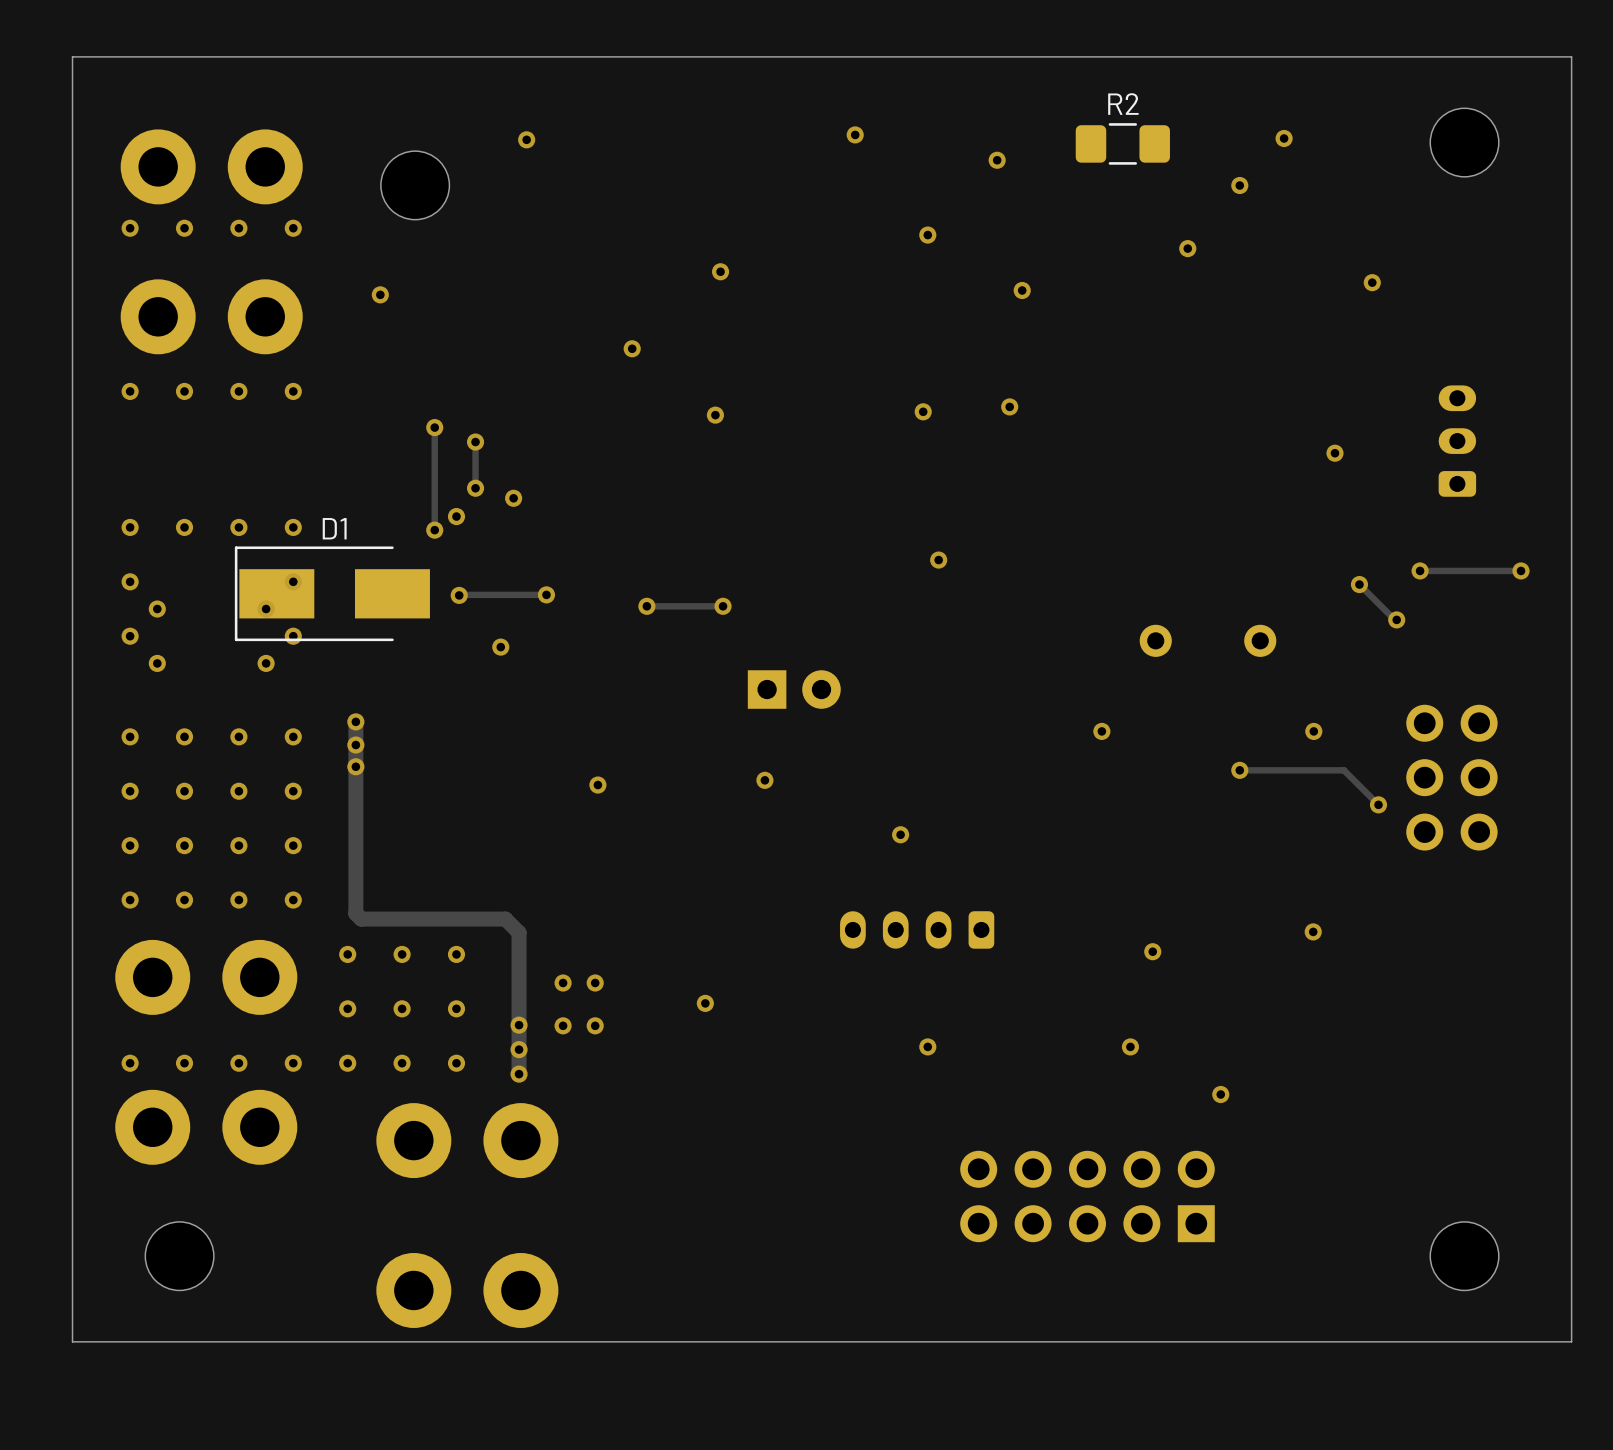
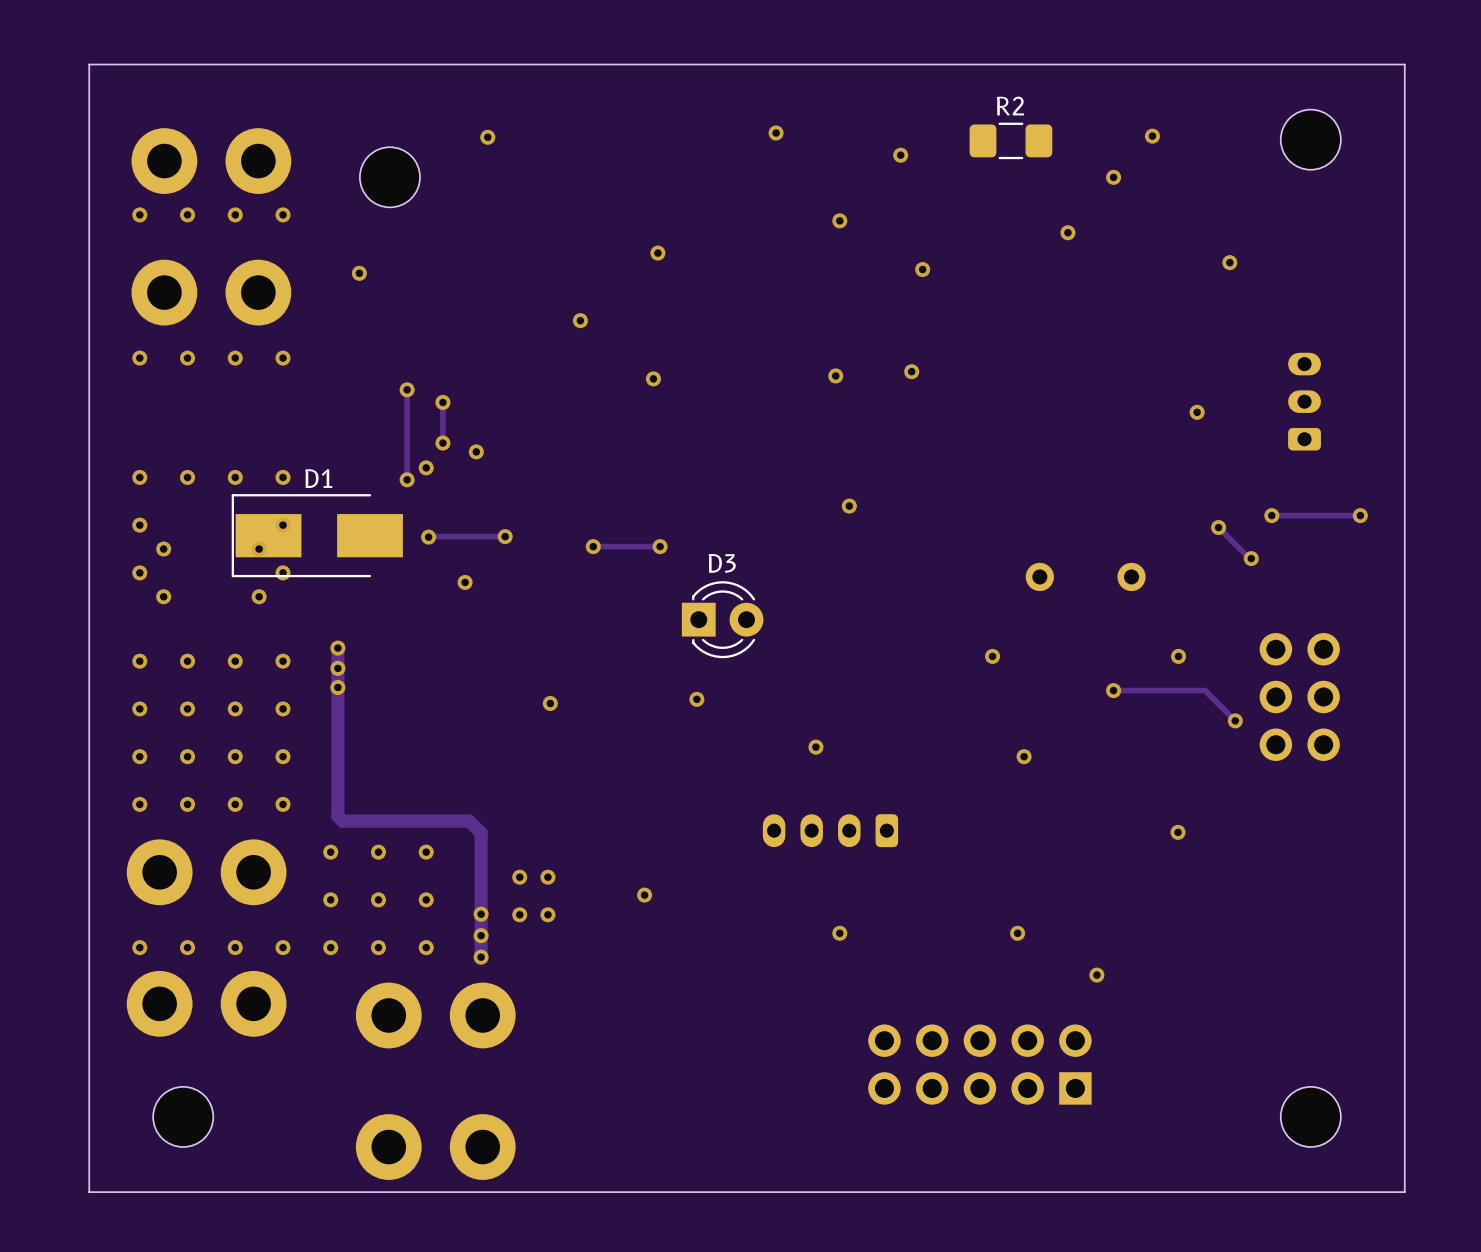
D3 side: top (794, 689) -> bottom (722, 619)
via position: (1152, 951) -> (1024, 756)

